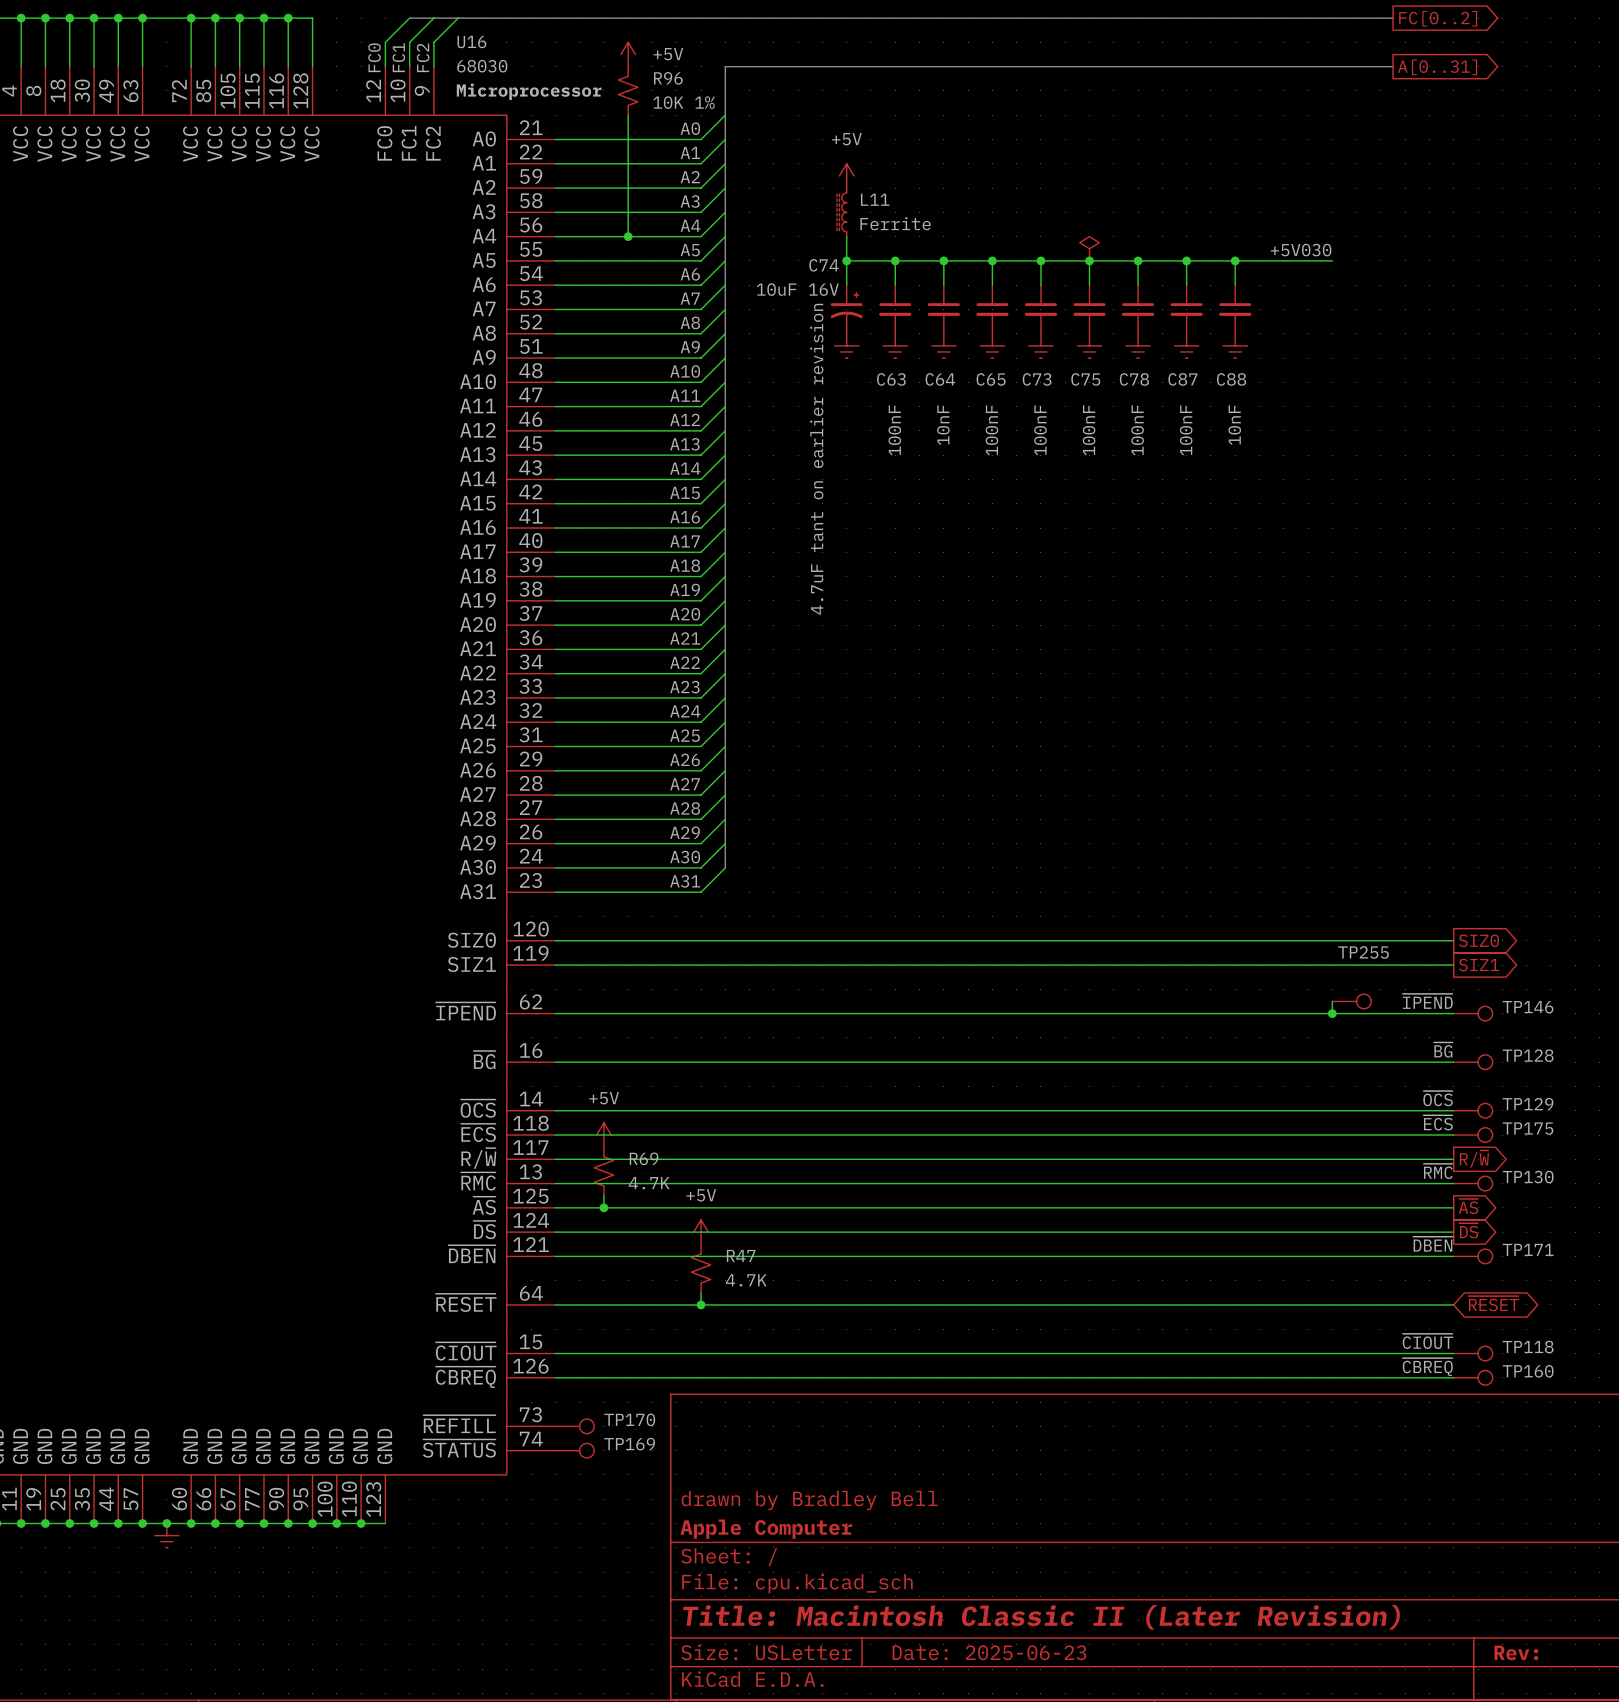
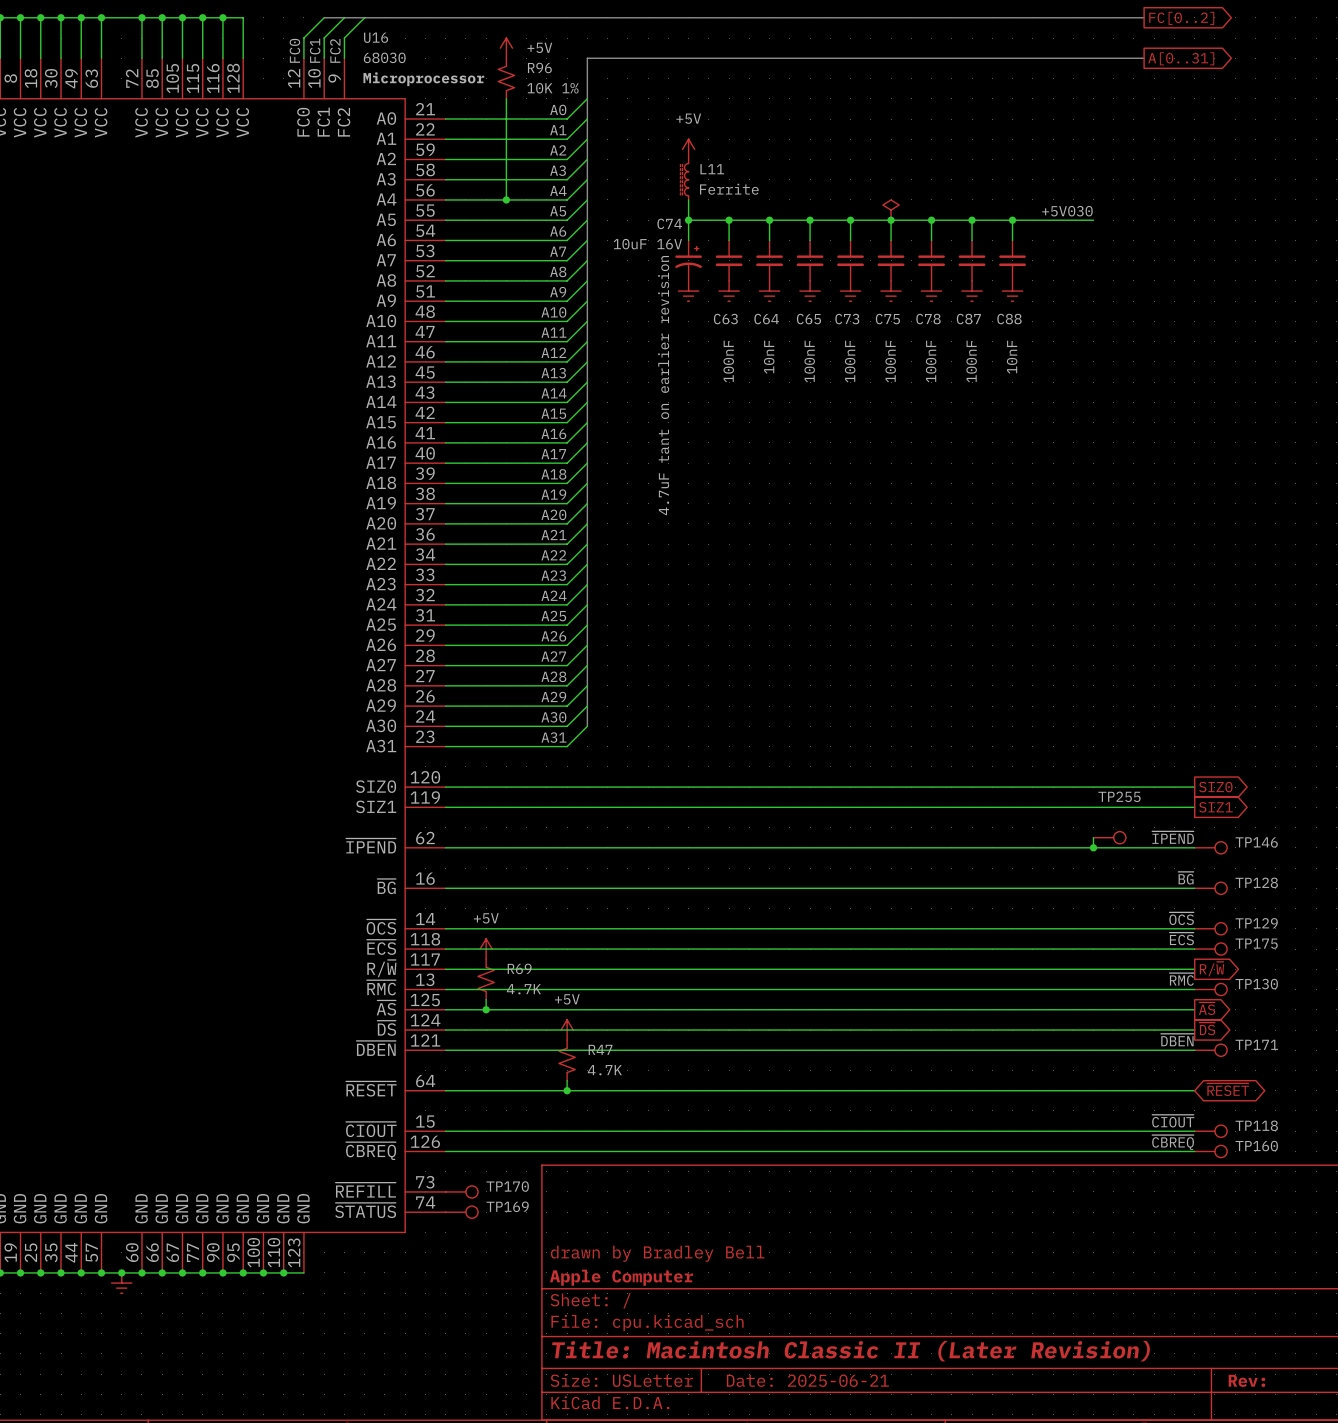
title block: Date: 2025-06-23 (989, 1652) -> Date: 2025-06-21 (807, 1380)

